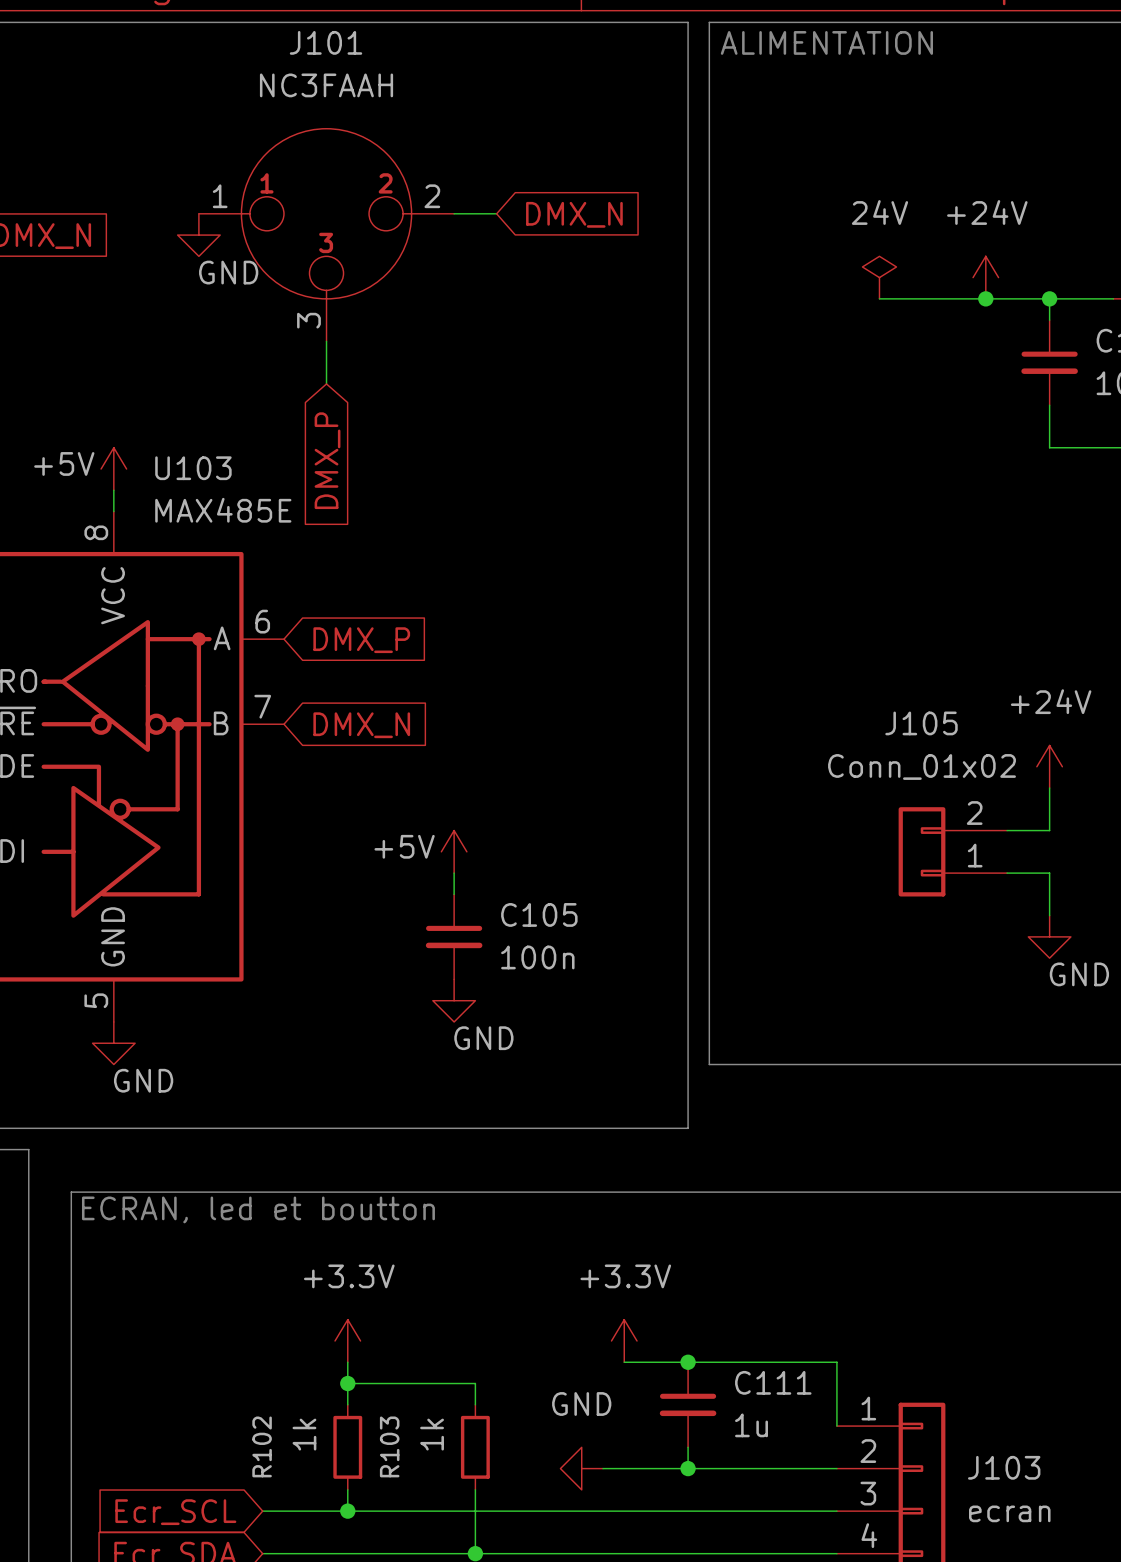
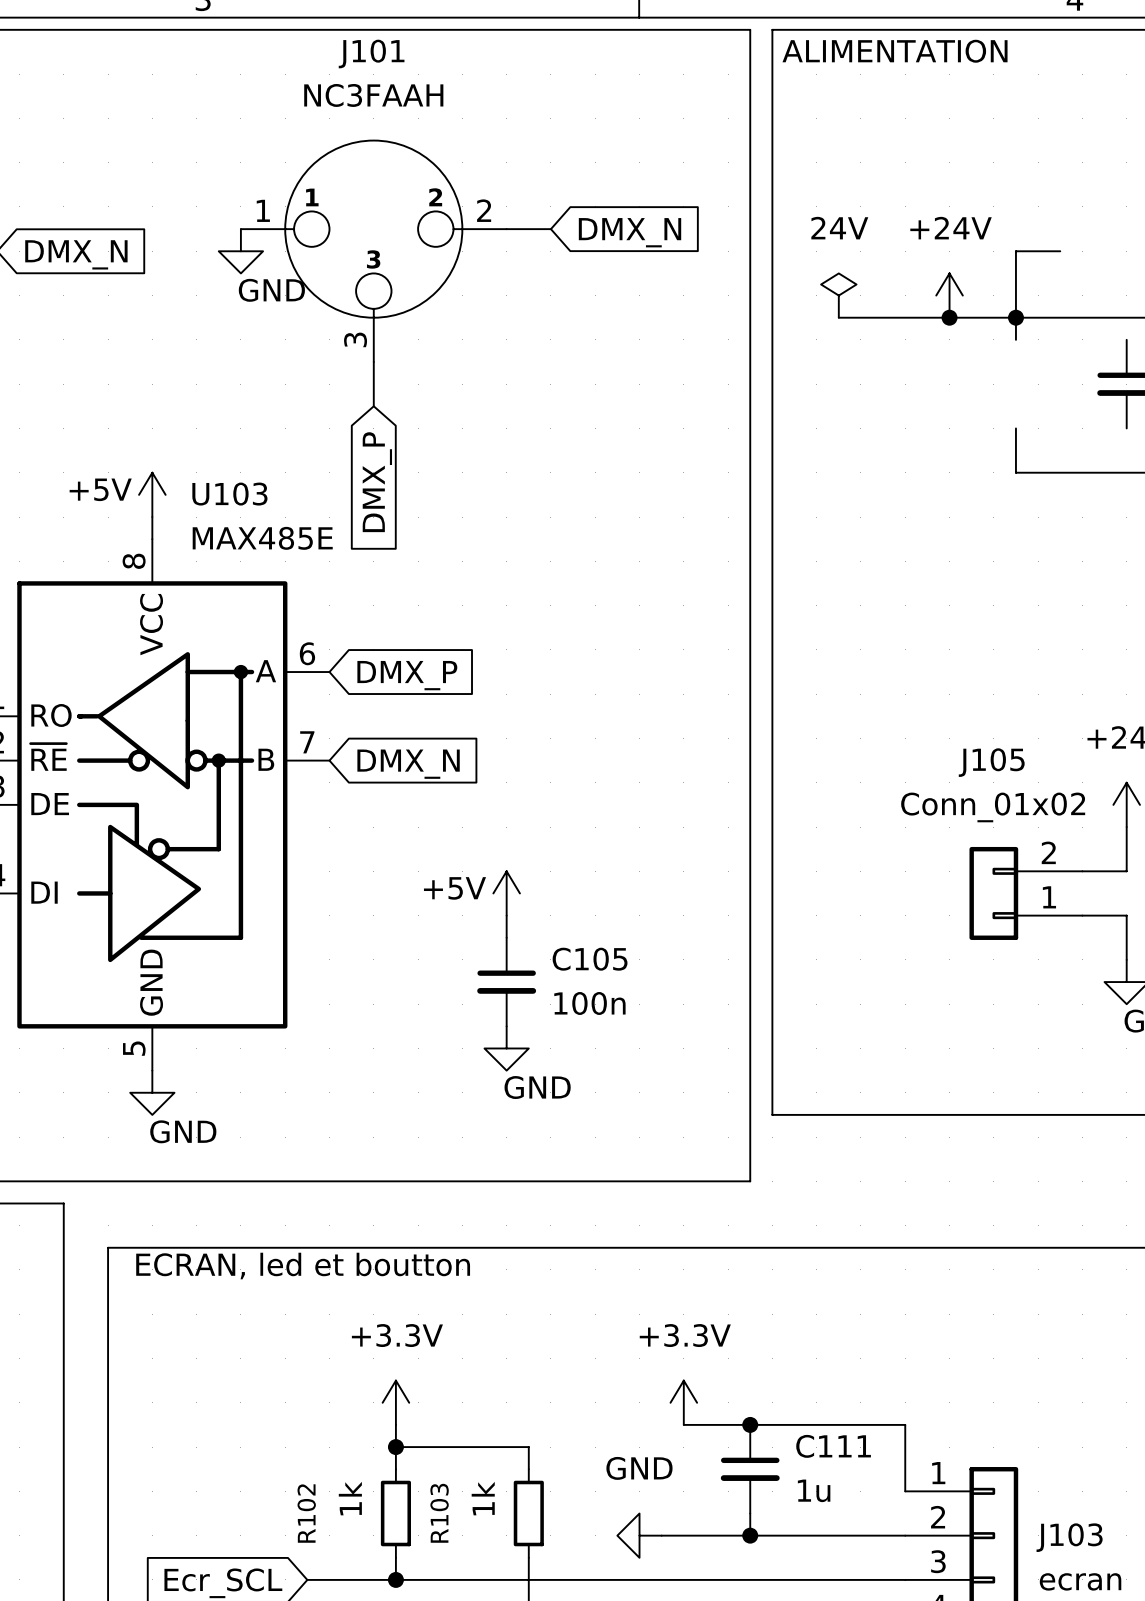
wire: none -> (1060, 251) (1015, 251) (1015, 339)
power symbol: none -> 24V (838, 295)
power symbol: 24V (879, 277) -> +24V (949, 295)
power symbol: +24V (985, 277) -> none
wire: none -> (838, 317) (949, 317)
junction: none -> (949, 317)
junction position: (985, 298) -> (1015, 317)
wire: (1049, 298) (1049, 320) -> none
junction: (1049, 298) -> none
wire: (1049, 405) (1049, 447) -> (1015, 428) (1015, 472) (1126, 472)

